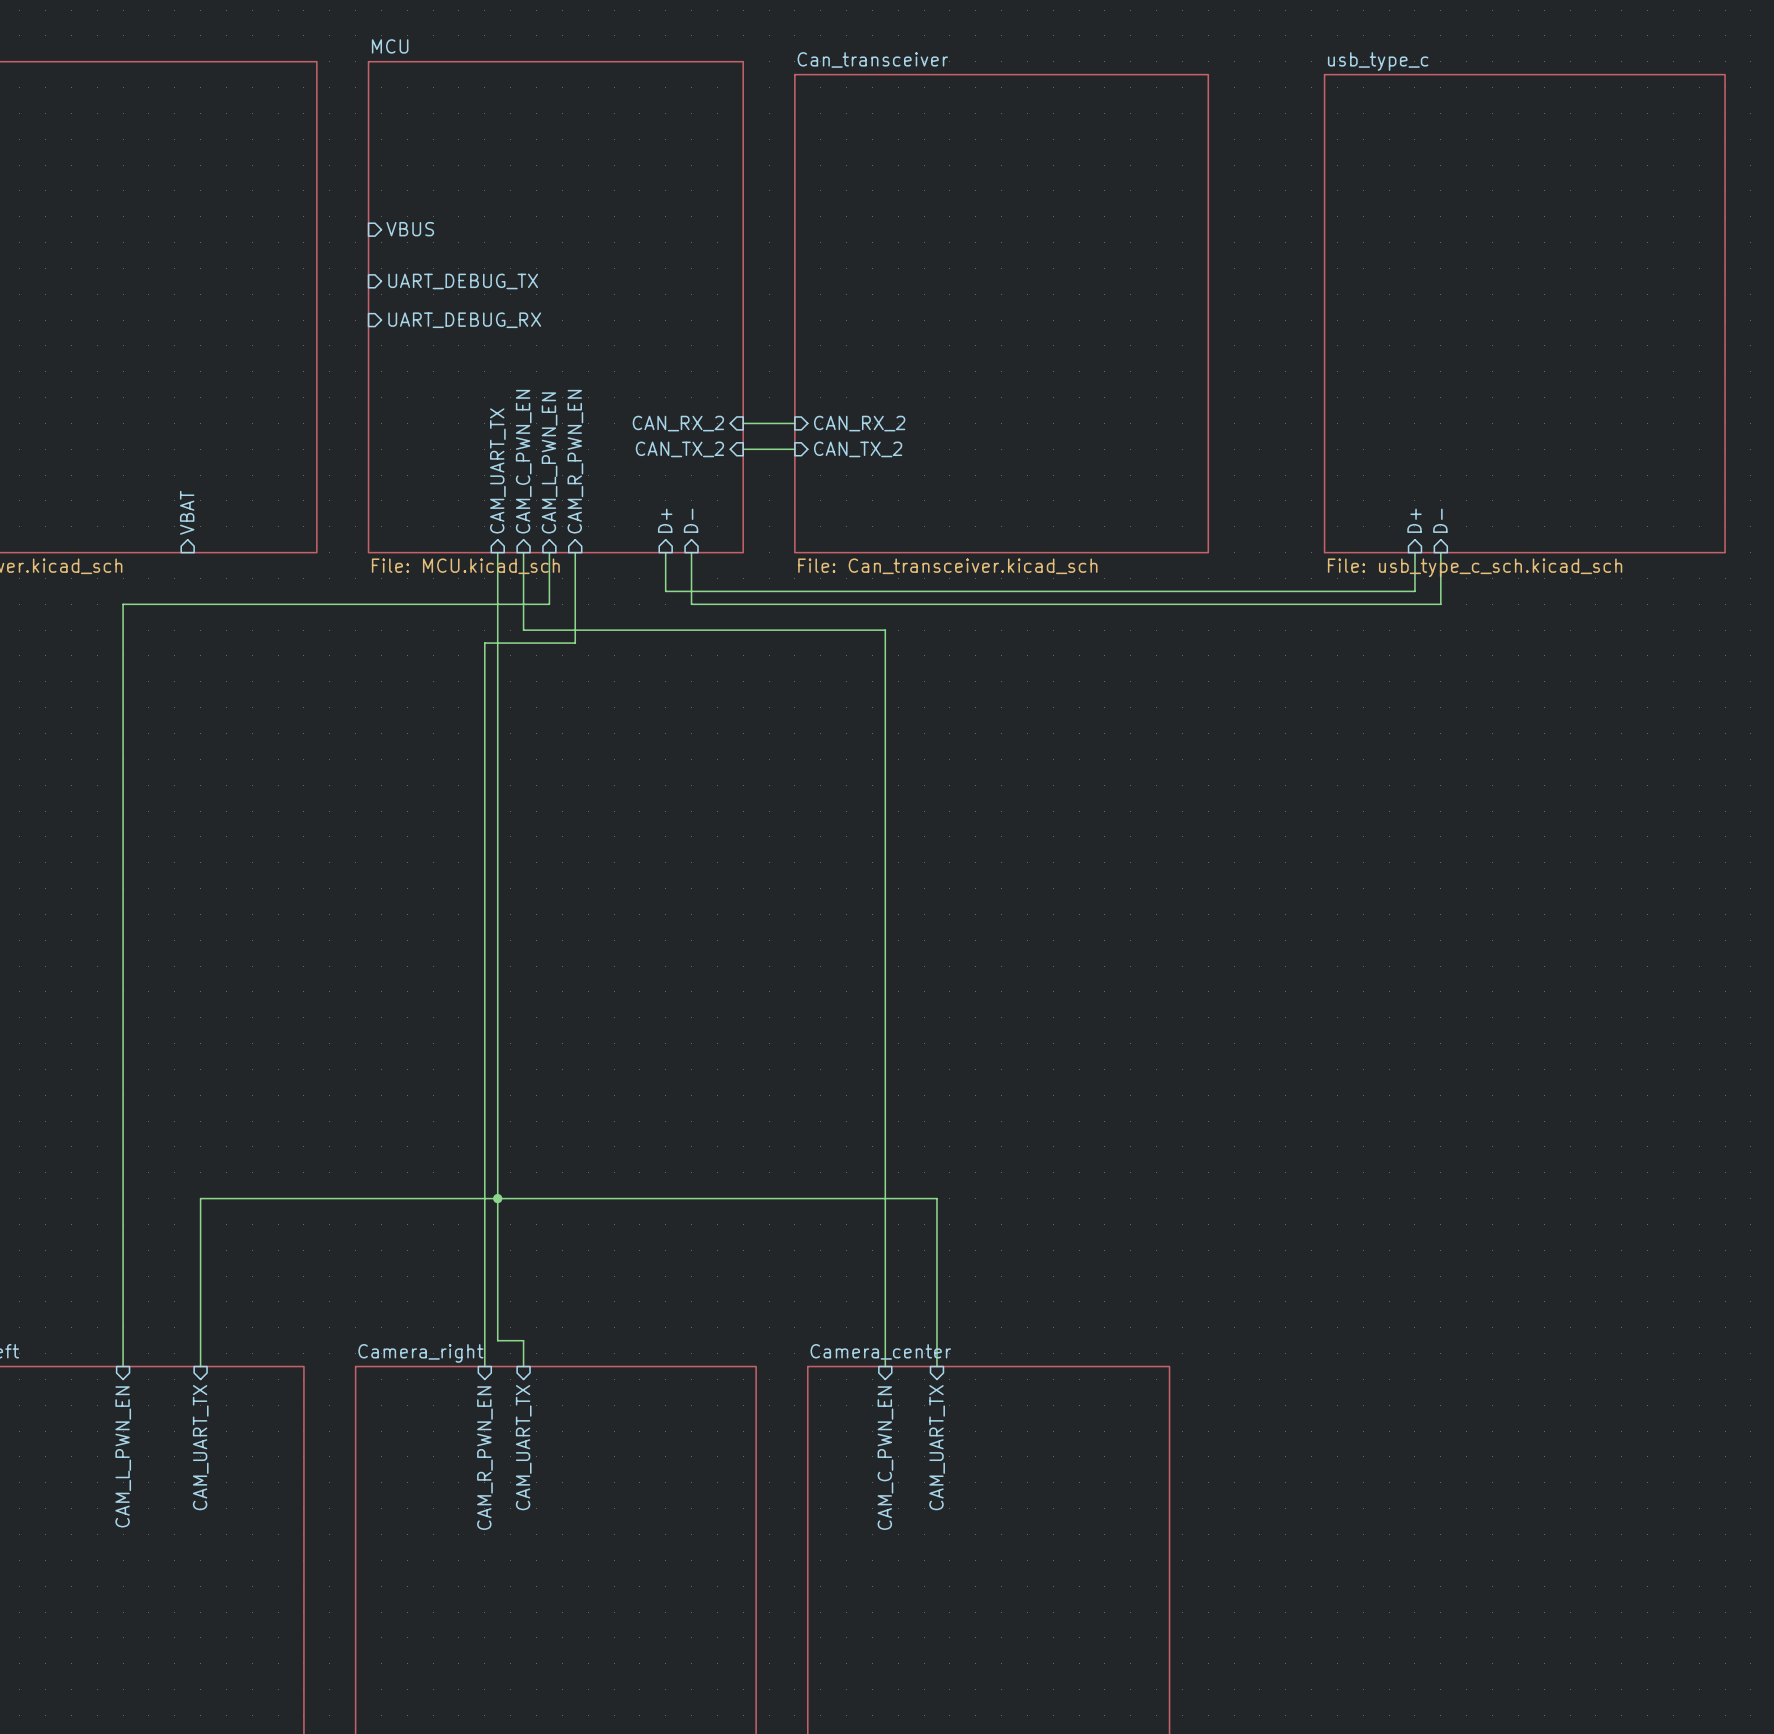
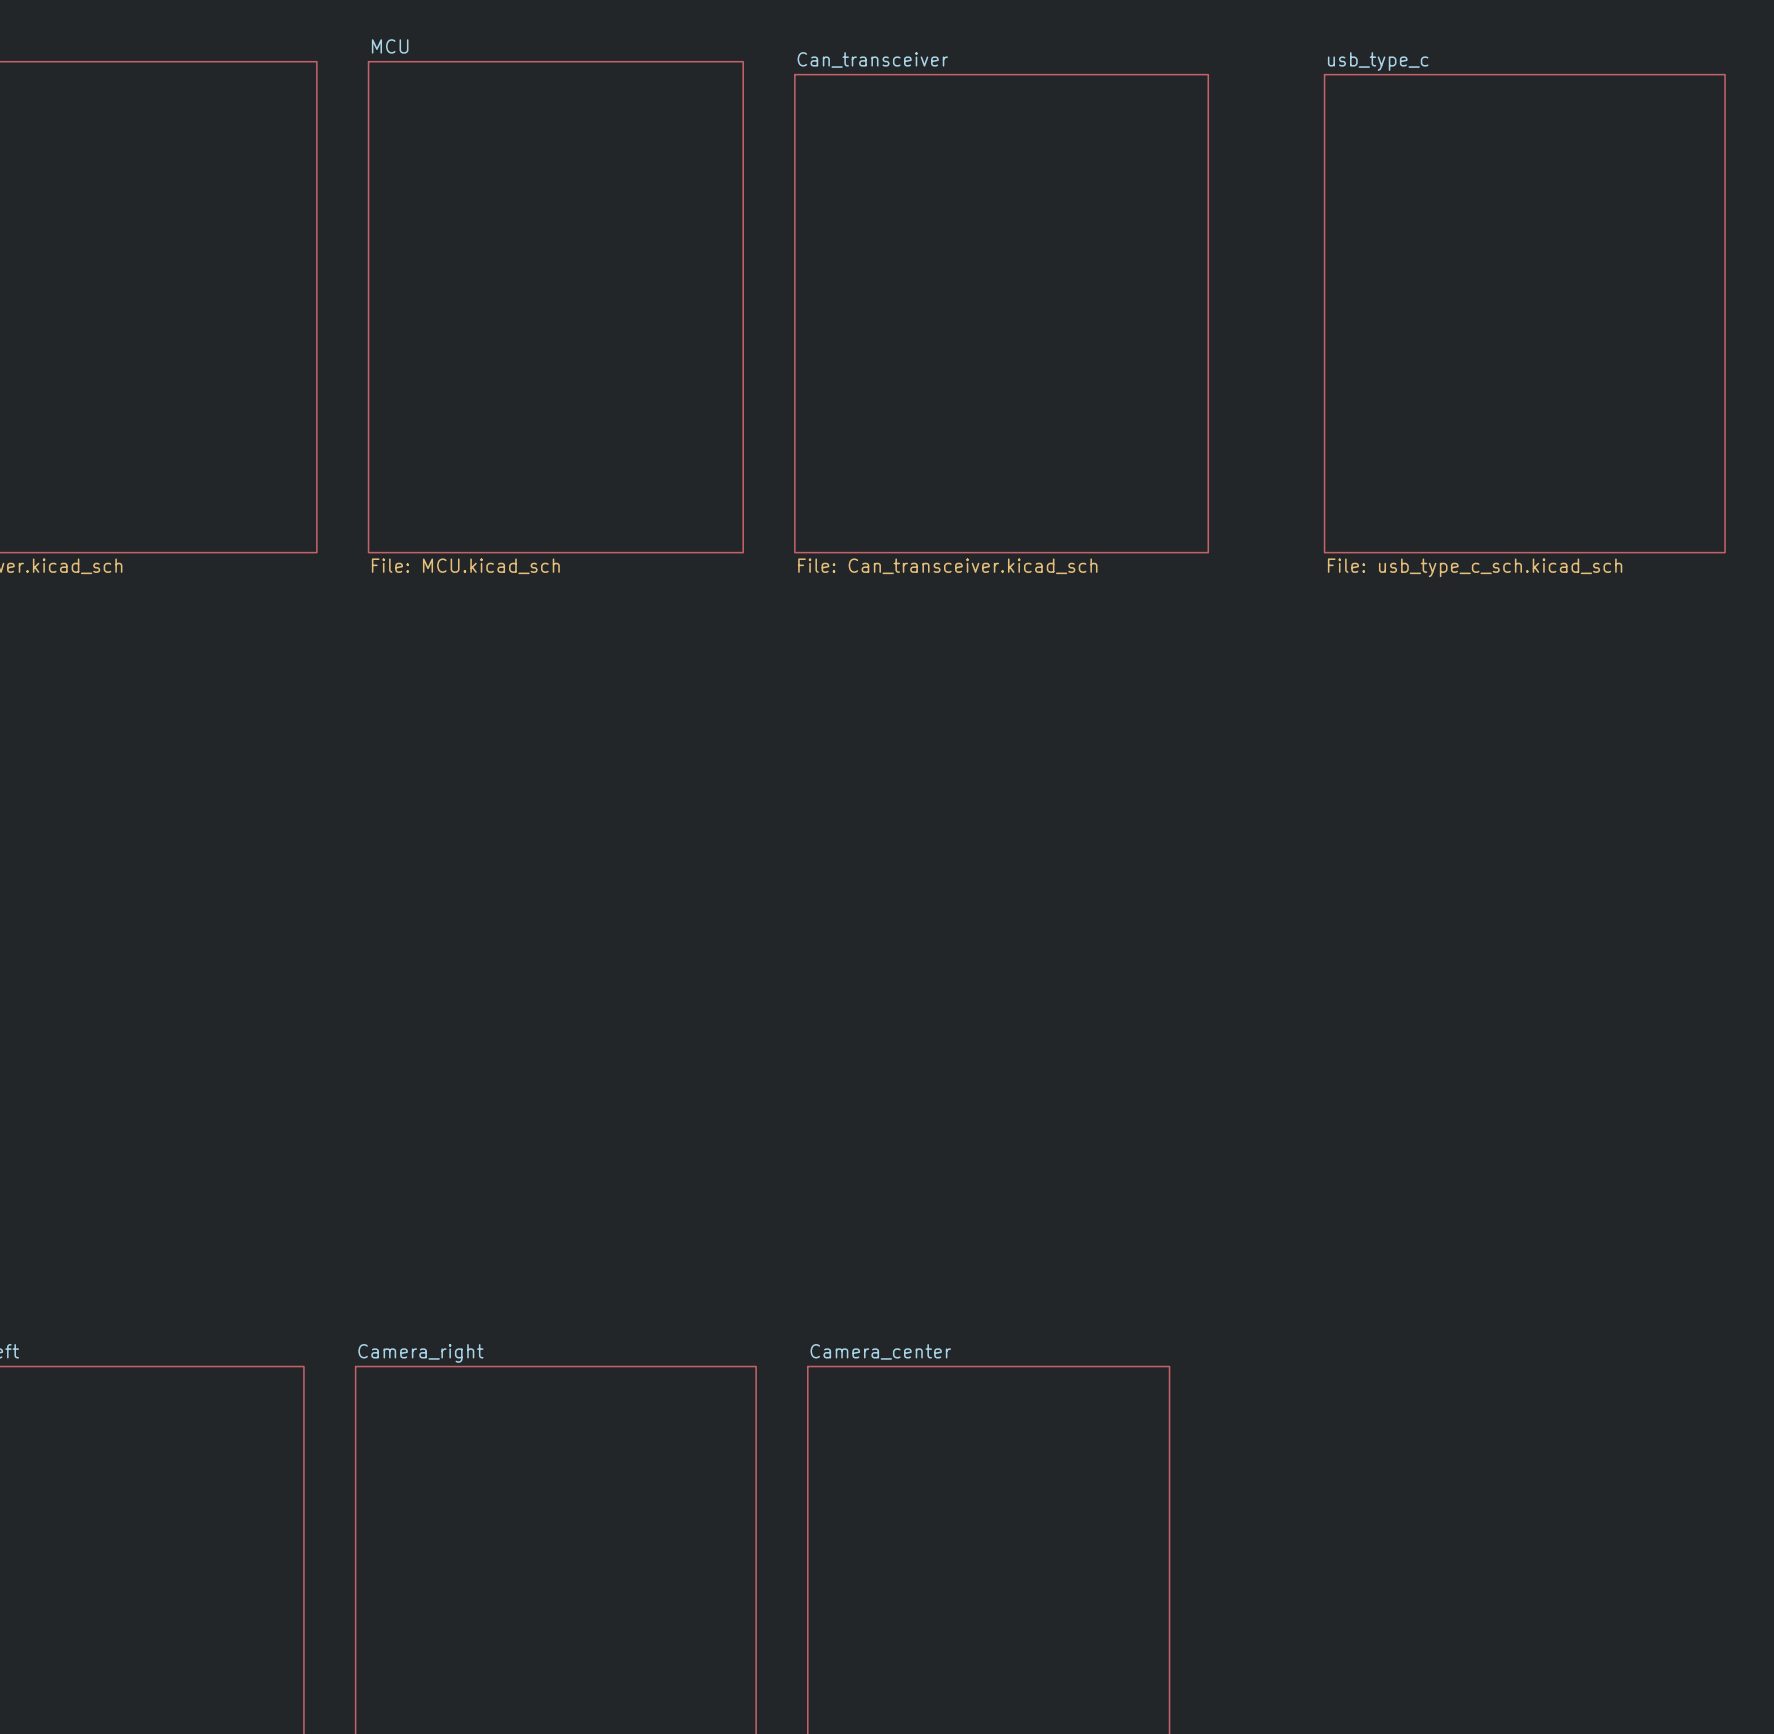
sheet pin: VBUS (410, 229) -> none
sheet pin: UART_DEBUG_TX (463, 281) -> none
sheet pin: UART_DEBUG_RX (464, 320) -> none
sheet pin: CAN_RX_2 (678, 423) -> none
wire: (743, 423) (794, 423) -> none
sheet pin: CAN_RX_2 (859, 423) -> none
sheet pin: CAN_TX_2 (679, 449) -> none
wire: (743, 449) (794, 449) -> none
sheet pin: CAN_TX_2 (858, 449) -> none
sheet pin: CAM_C_PWN_EN (523, 461) -> none
sheet pin: CAM_R_PWN_EN (575, 461) -> none
sheet pin: CAM_L_PWN_EN (549, 462) -> none
sheet pin: CAM_UART_TX (497, 470) -> none
sheet pin: VBAT (187, 512) -> none
sheet pin: D+ (665, 520) -> none
sheet pin: D- (691, 520) -> none
sheet pin: D+ (1414, 520) -> none
sheet pin: D- (1440, 520) -> none
wire: (497, 552) (497, 1340) (523, 1340) (523, 1366) -> none
wire: (523, 552) (523, 630) (885, 630) (885, 1366) -> none
wire: (549, 552) (549, 604) (123, 604) (123, 1366) -> none
wire: (575, 552) (575, 643) (484, 643) (484, 1366) -> none
wire: (665, 552) (665, 591) (1414, 591) (1414, 552) -> none
wire: (691, 552) (691, 604) (1440, 604) (1440, 552) -> none
junction: (497, 1198) -> none
wire: (200, 1366) (200, 1198) (936, 1198) (936, 1366) -> none
sheet pin: CAM_UART_TX (200, 1447) -> none
sheet pin: CAM_UART_TX (523, 1447) -> none
sheet pin: CAM_UART_TX (937, 1447) -> none
sheet pin: CAM_L_PWN_EN (123, 1456) -> none
sheet pin: CAM_R_PWN_EN (484, 1458) -> none
sheet pin: CAM_C_PWN_EN (885, 1458) -> none

